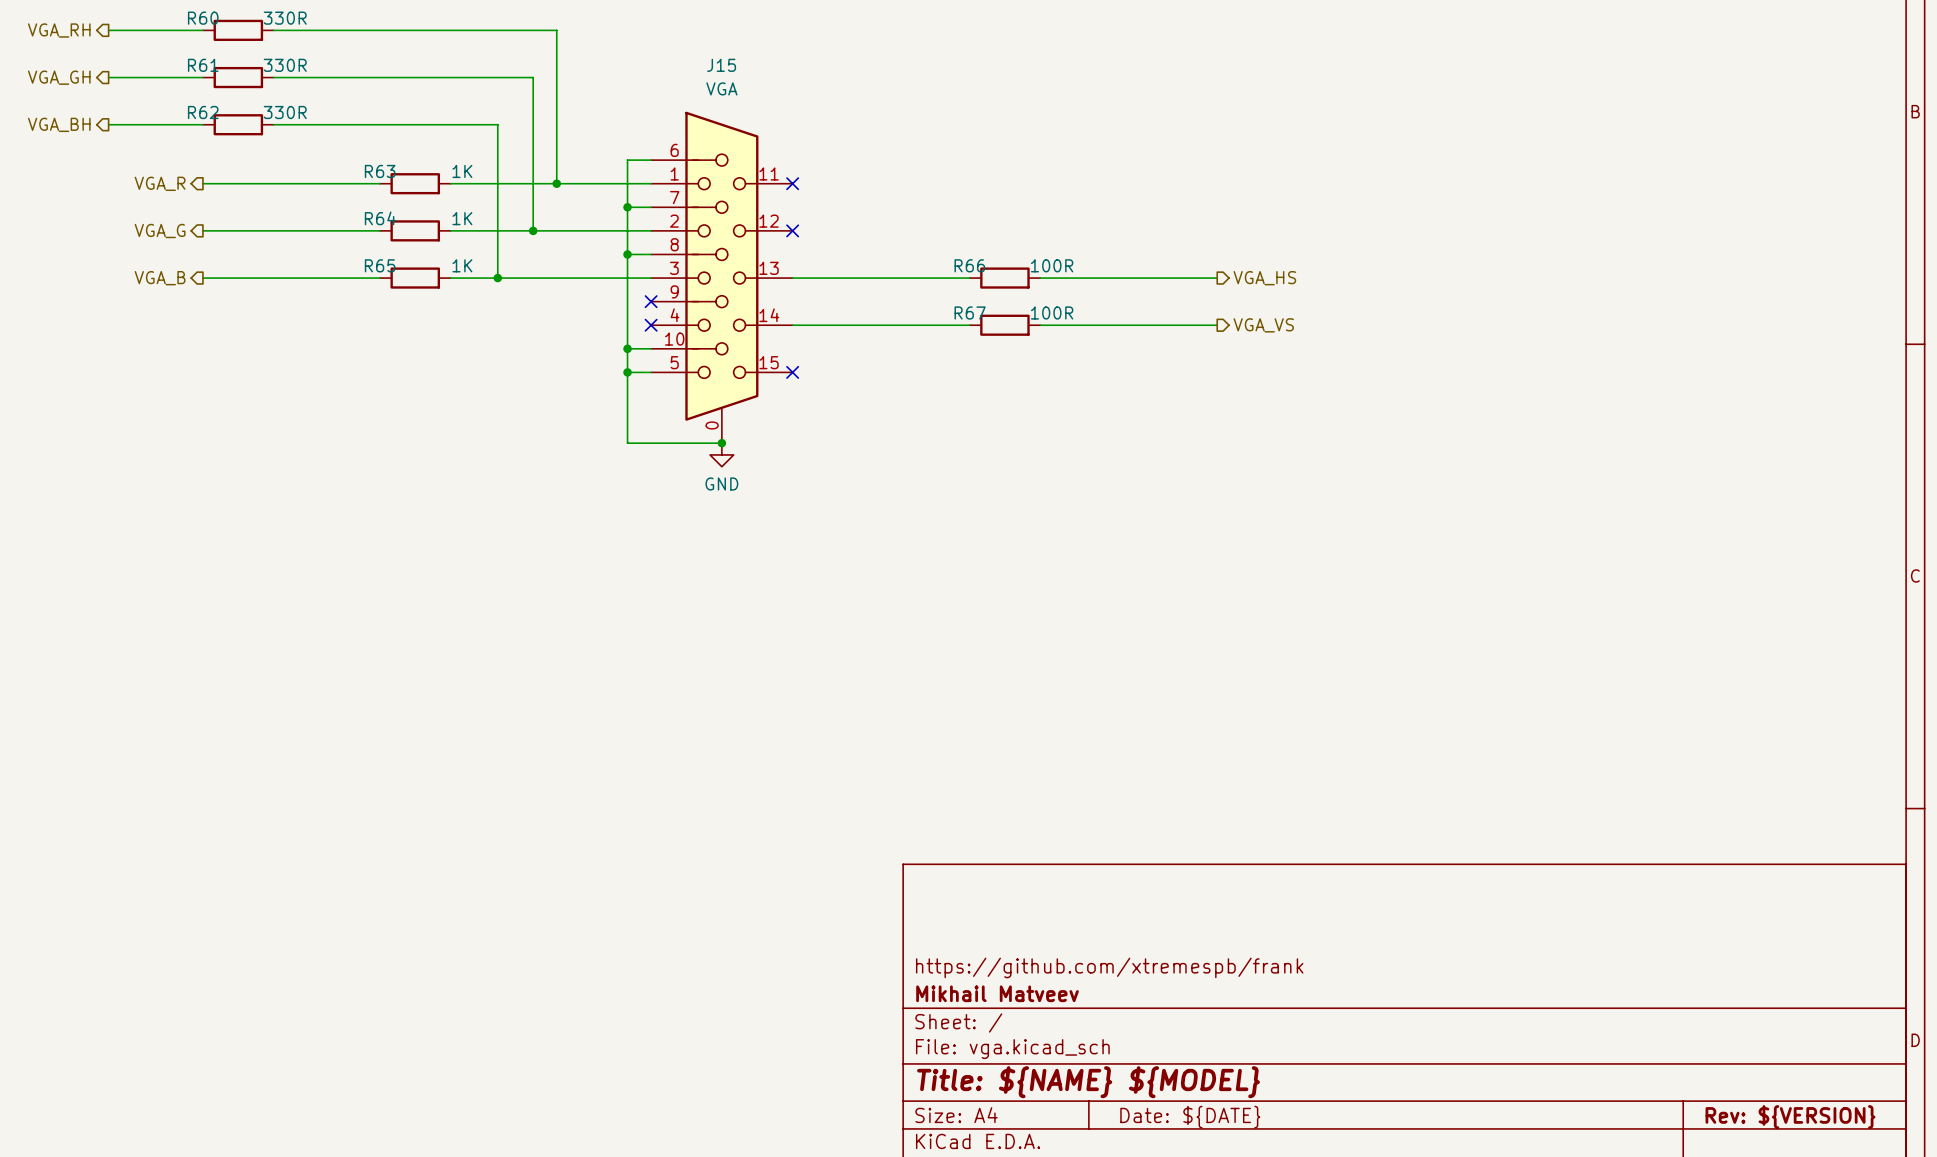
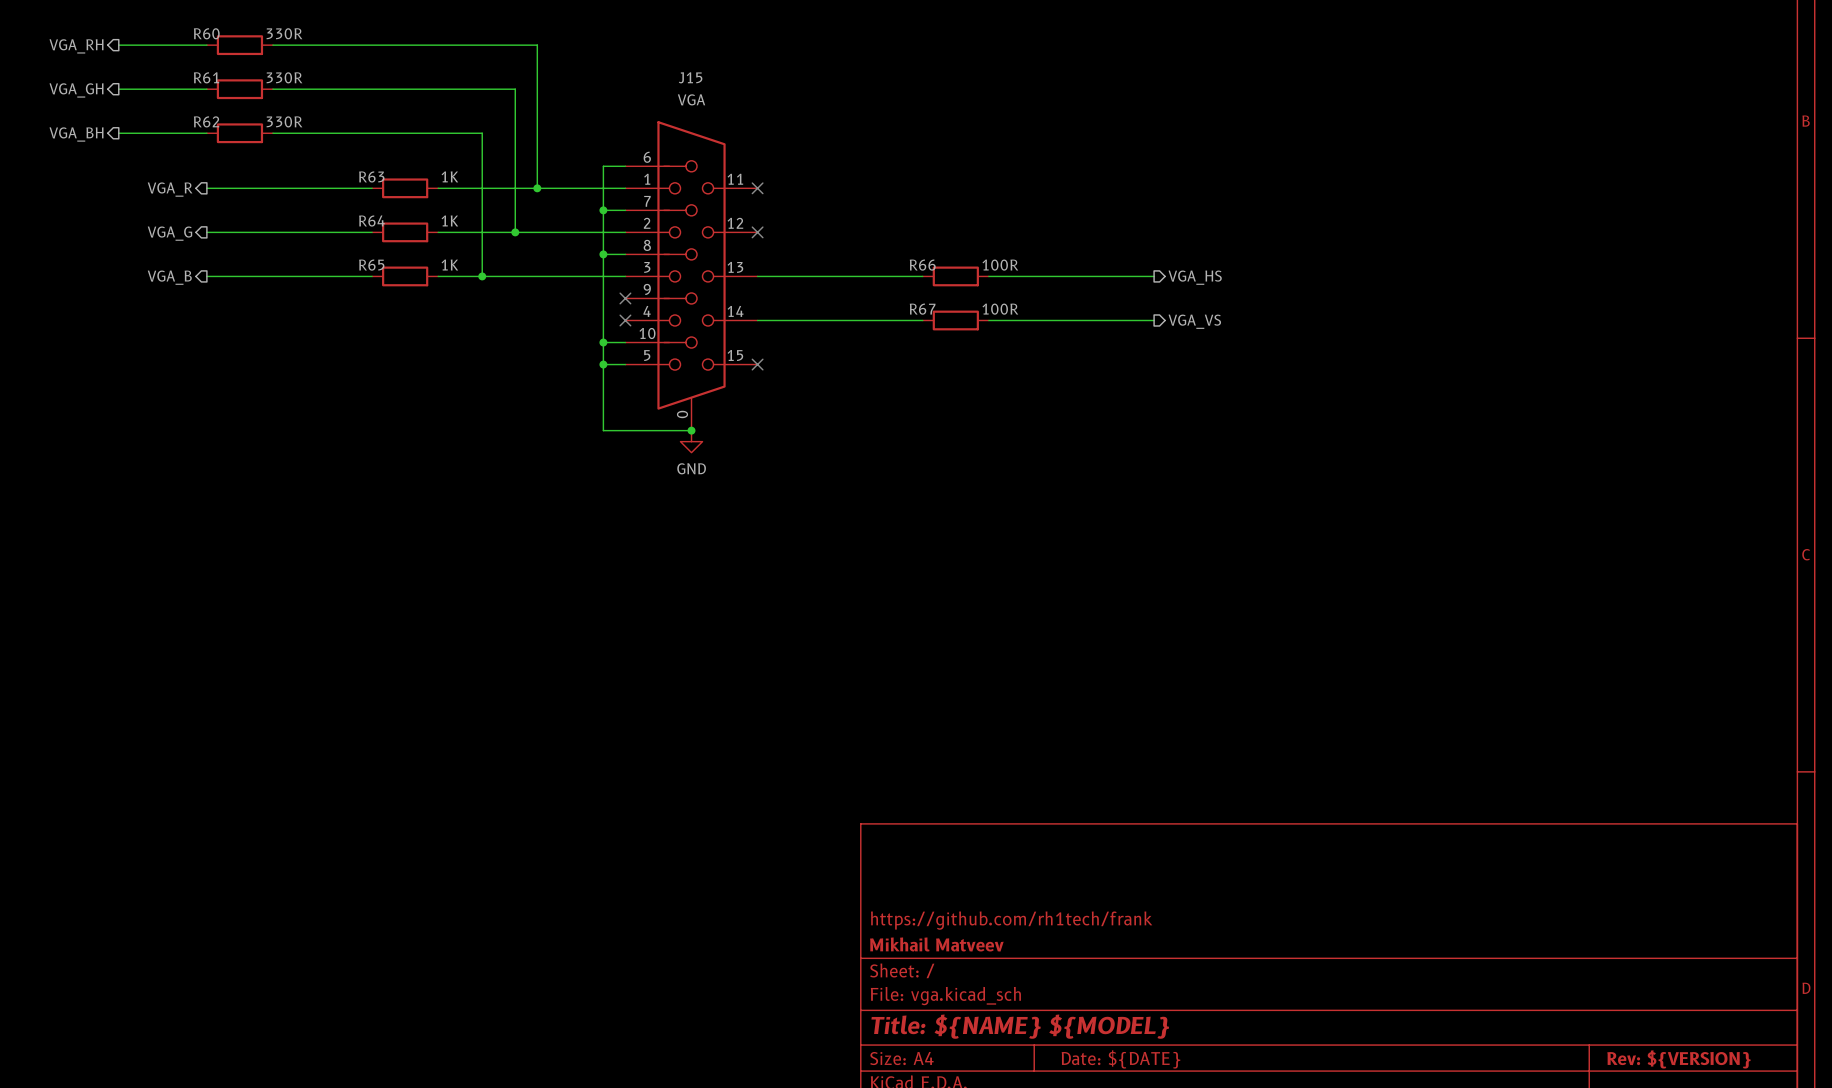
title block: https://github.com/xtremespb/frank (1109, 967) -> https://github.com/rh1tech/frank (1011, 920)

